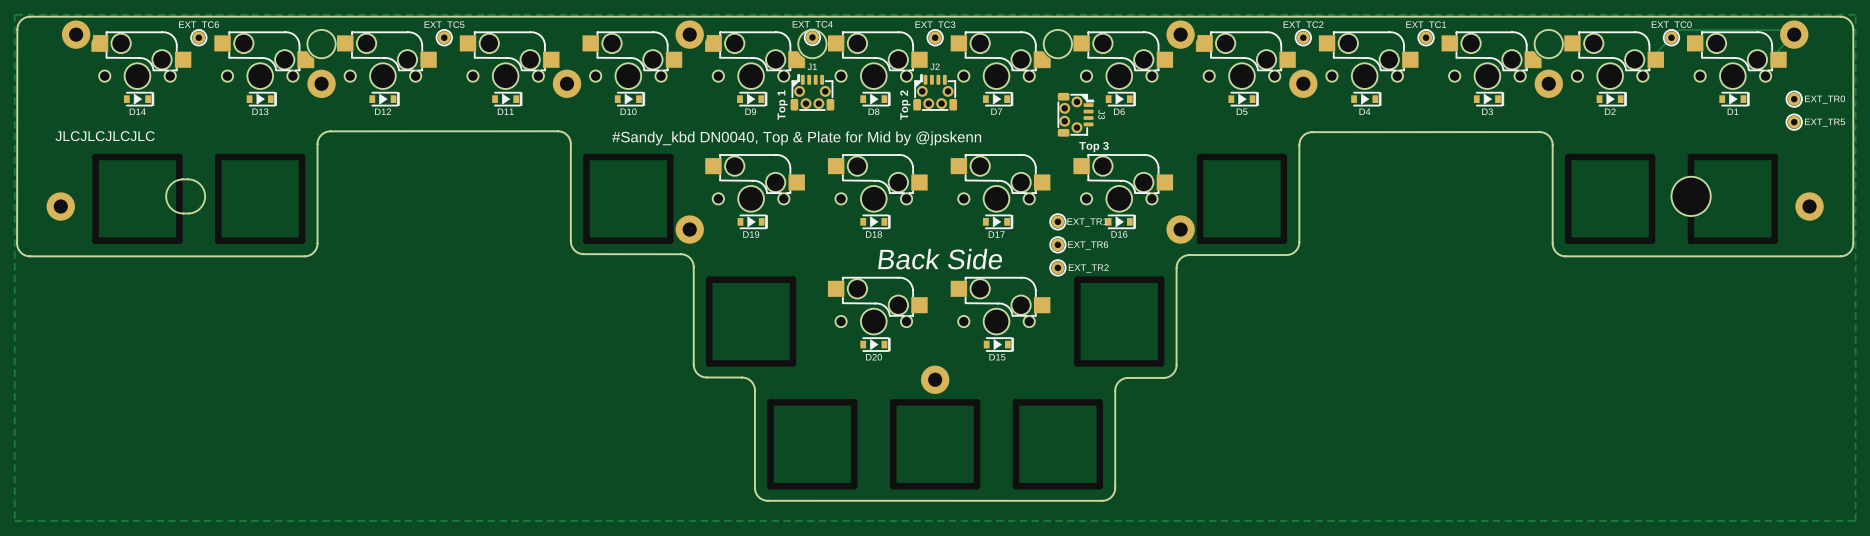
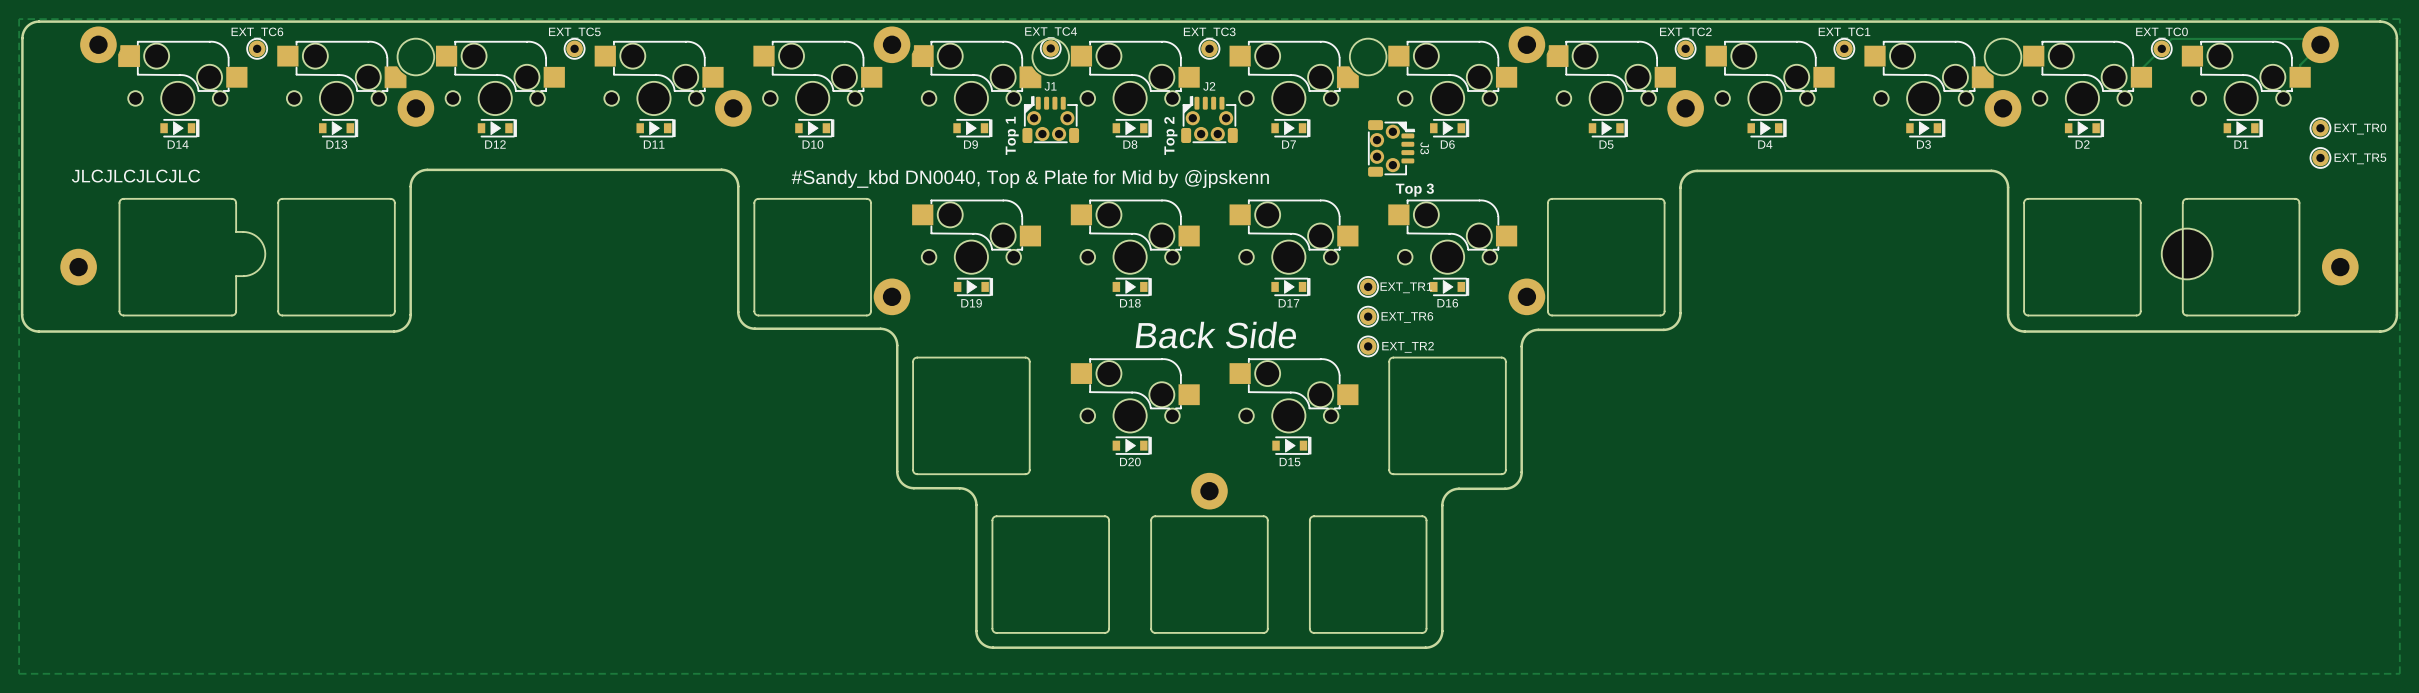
part footprint: [16, 15, 1855, 502] -> [20, 20, 2399, 649]

